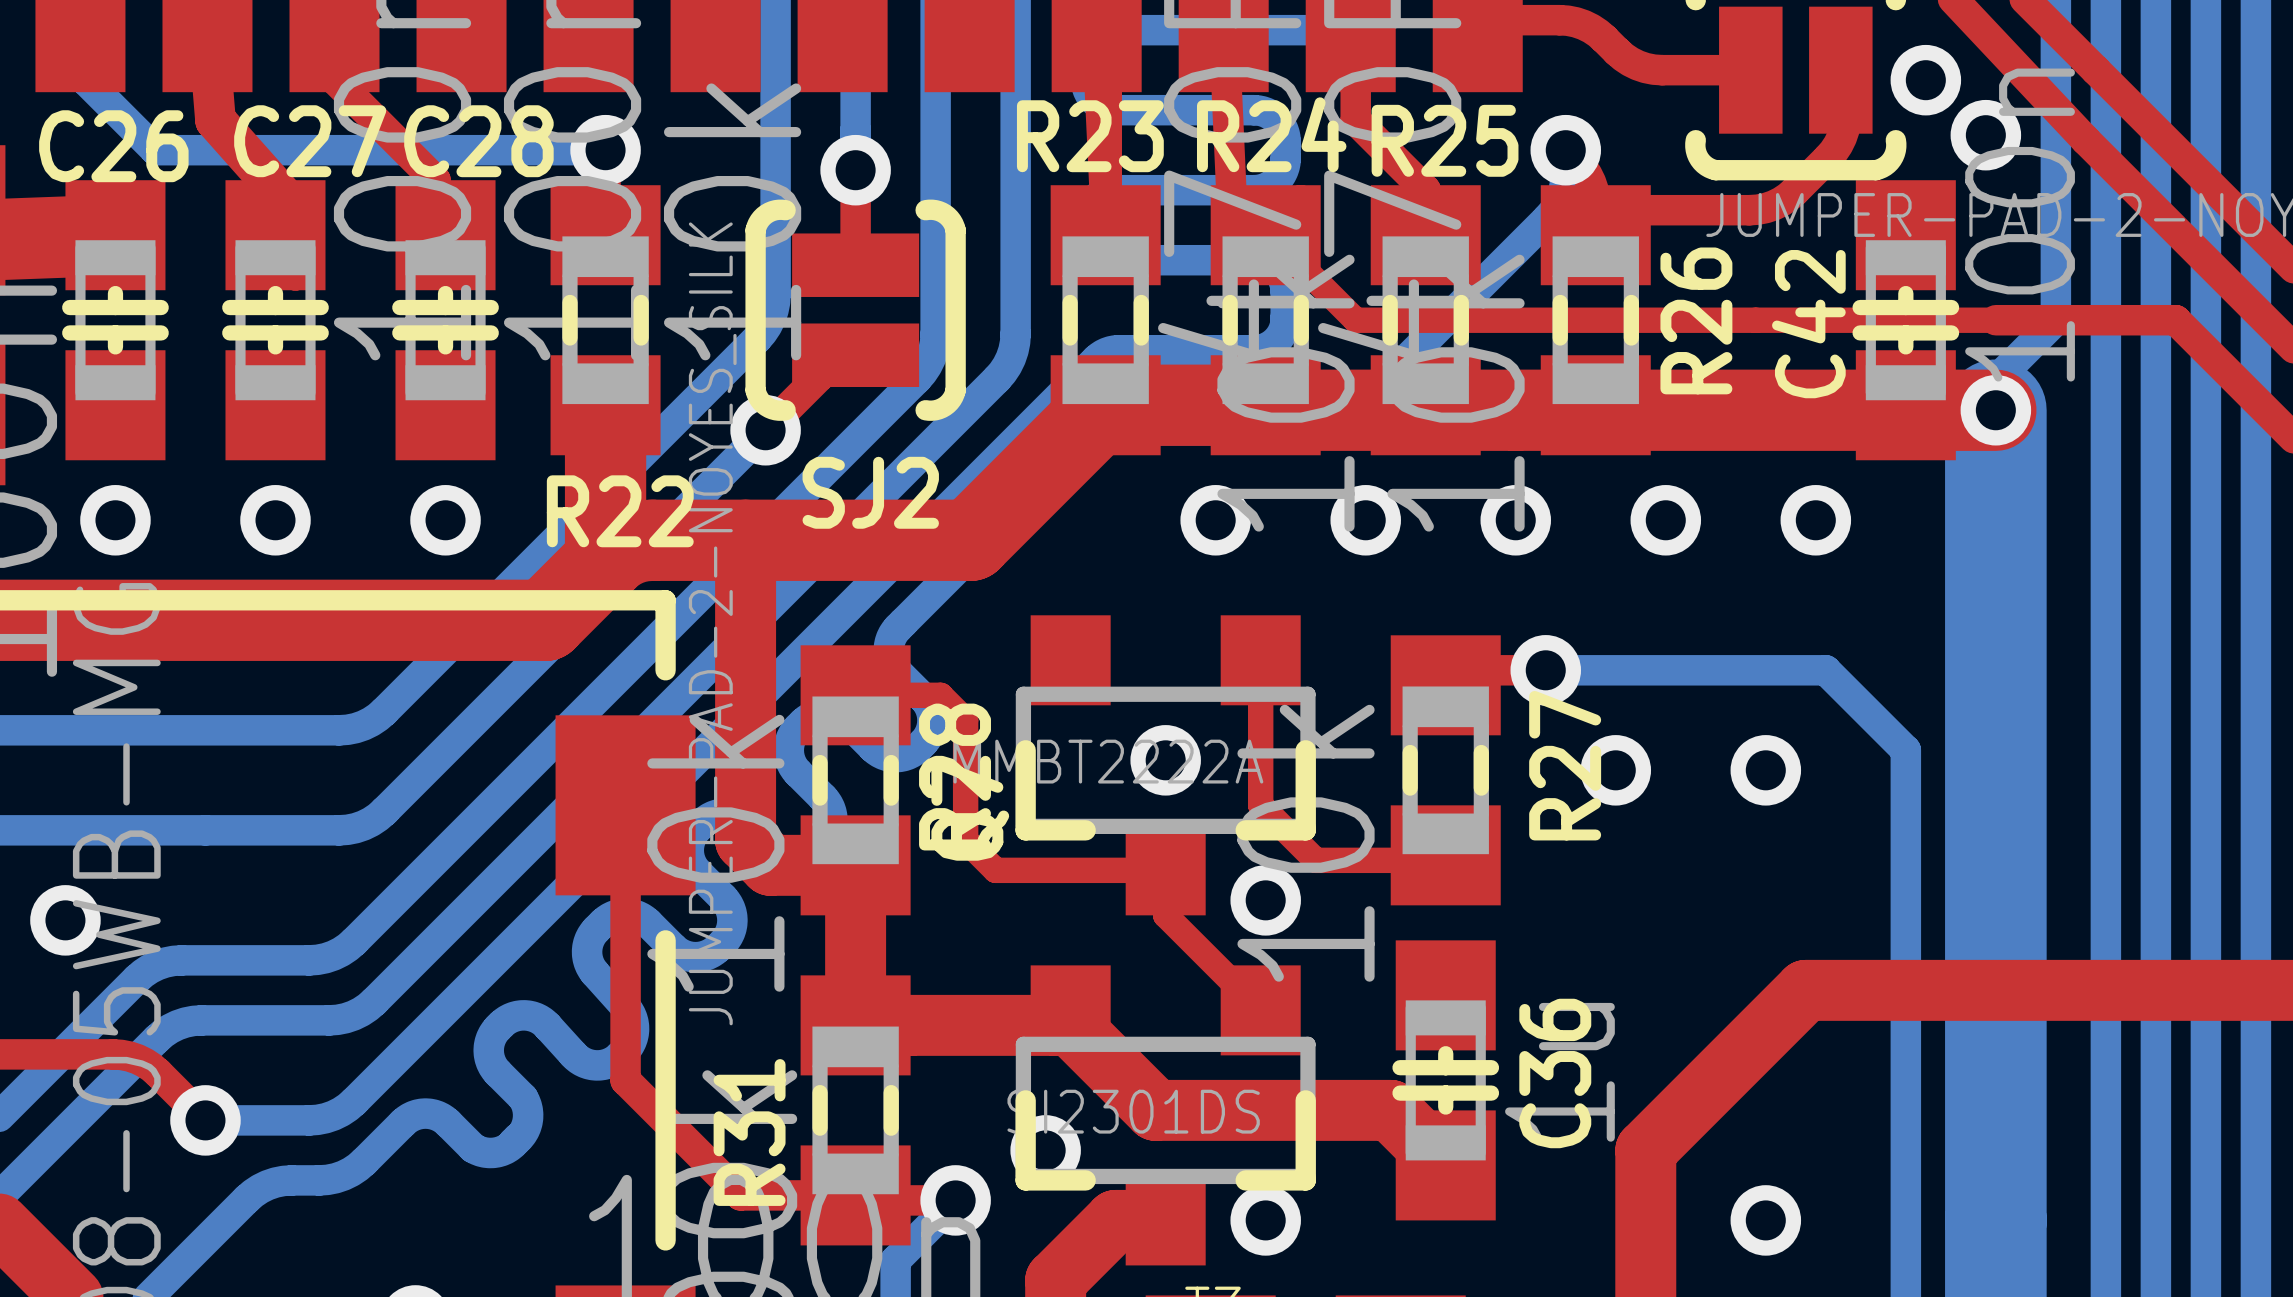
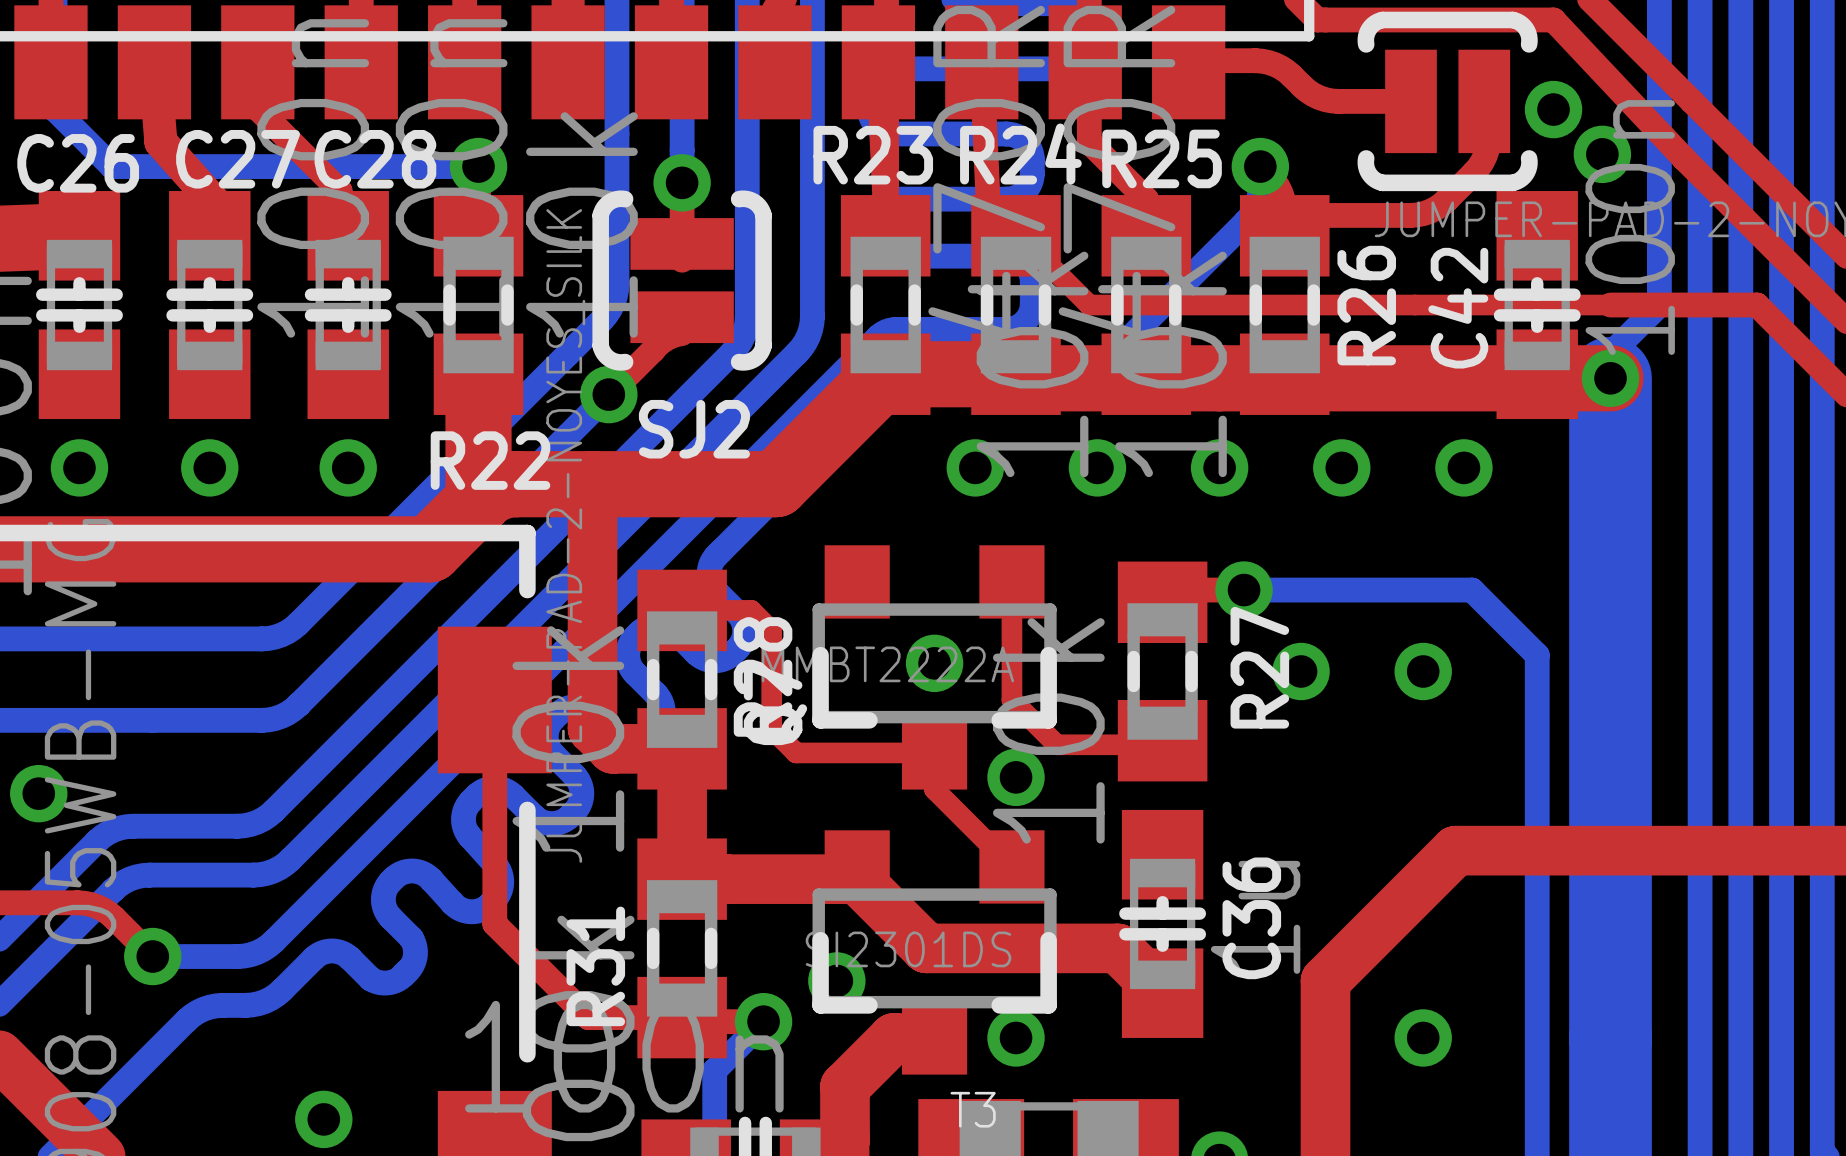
SJ2 position: (855, 310) -> (682, 280)

